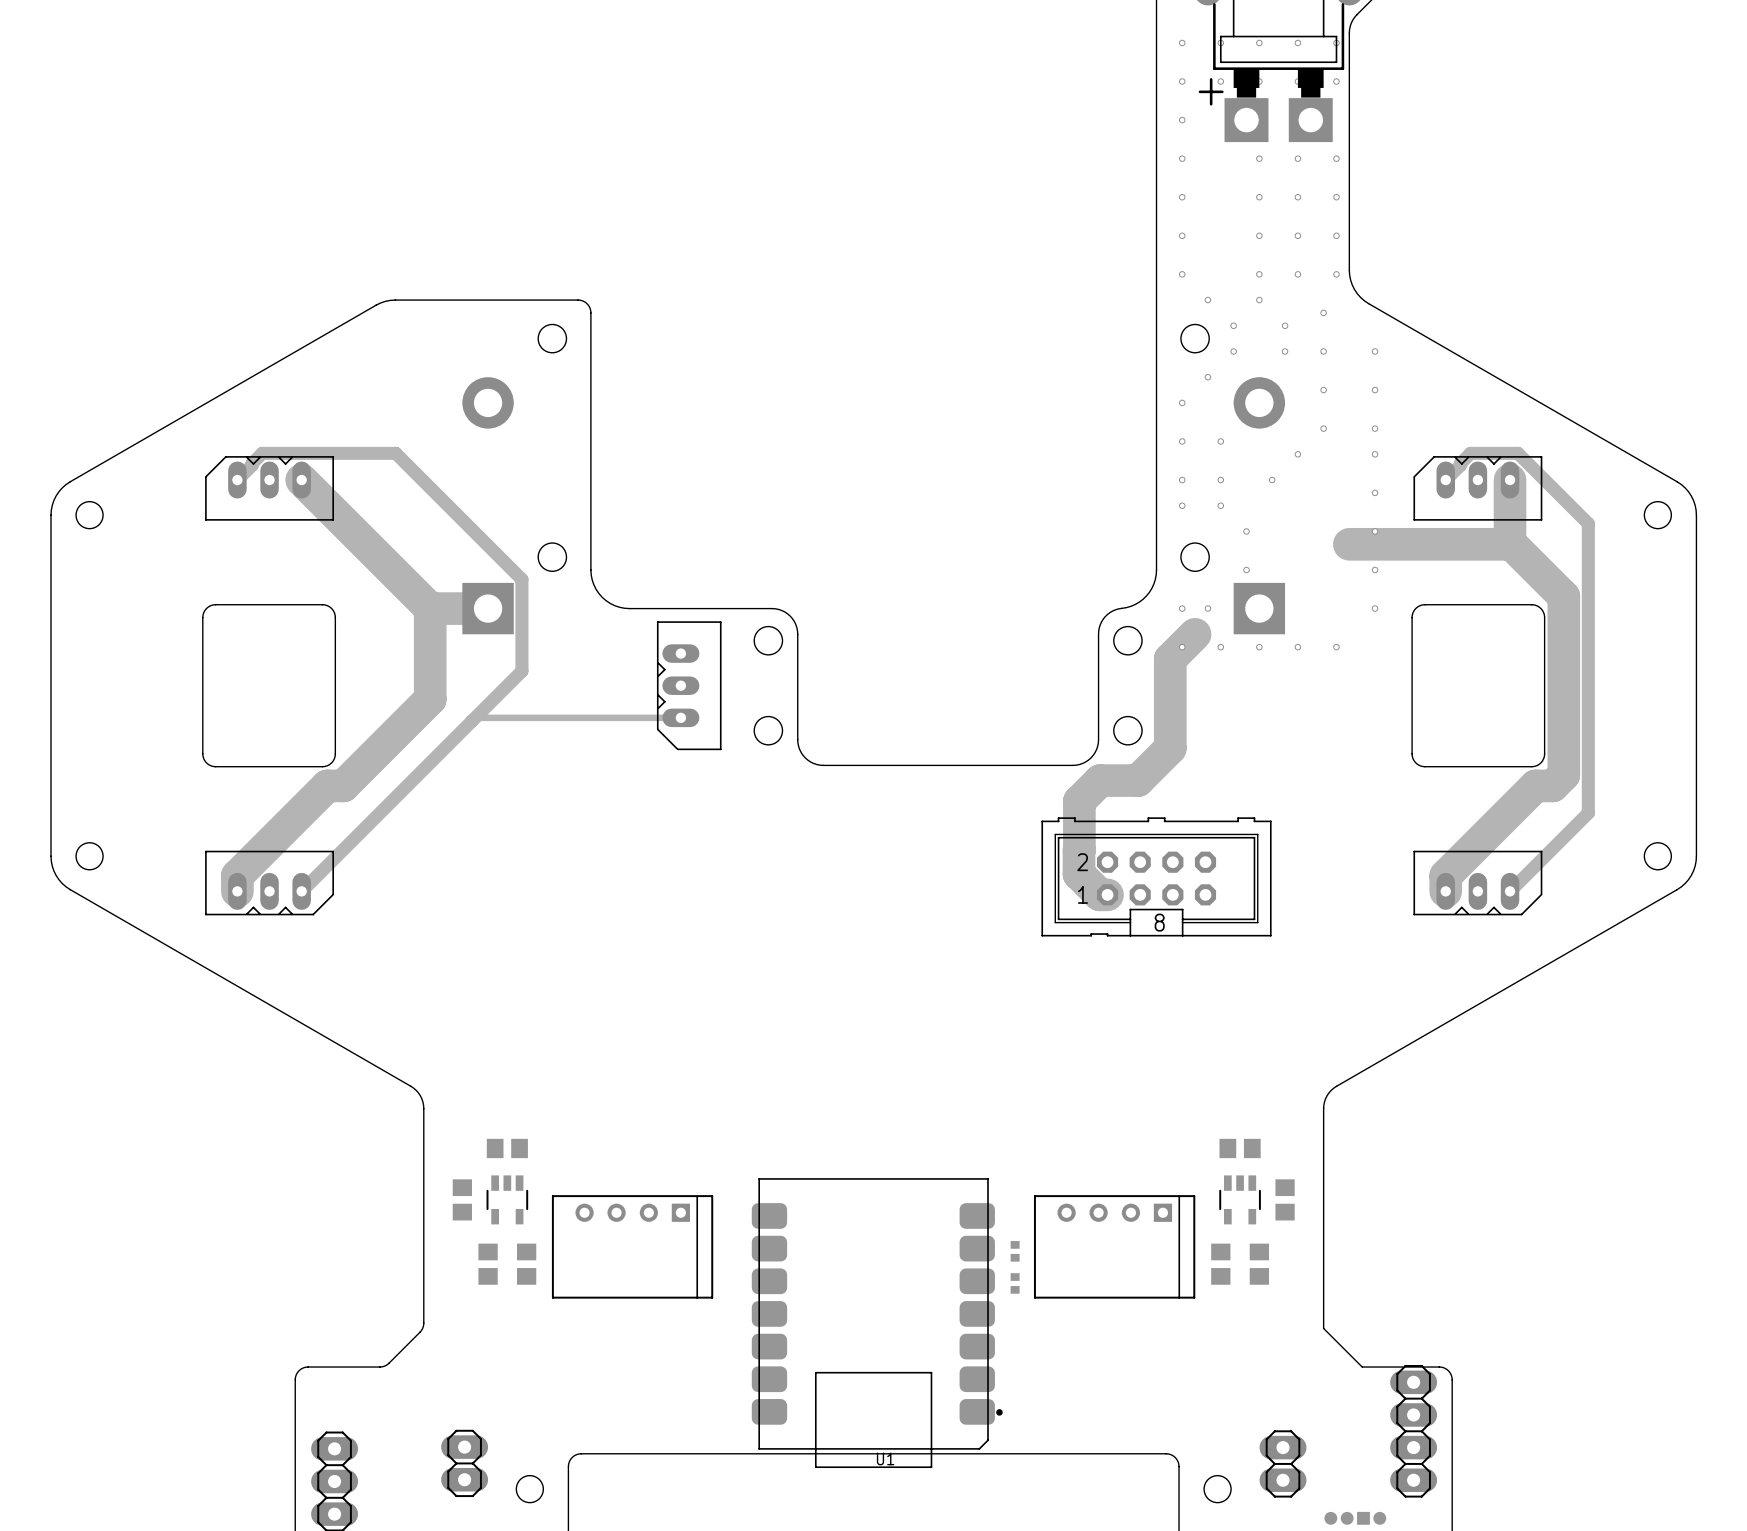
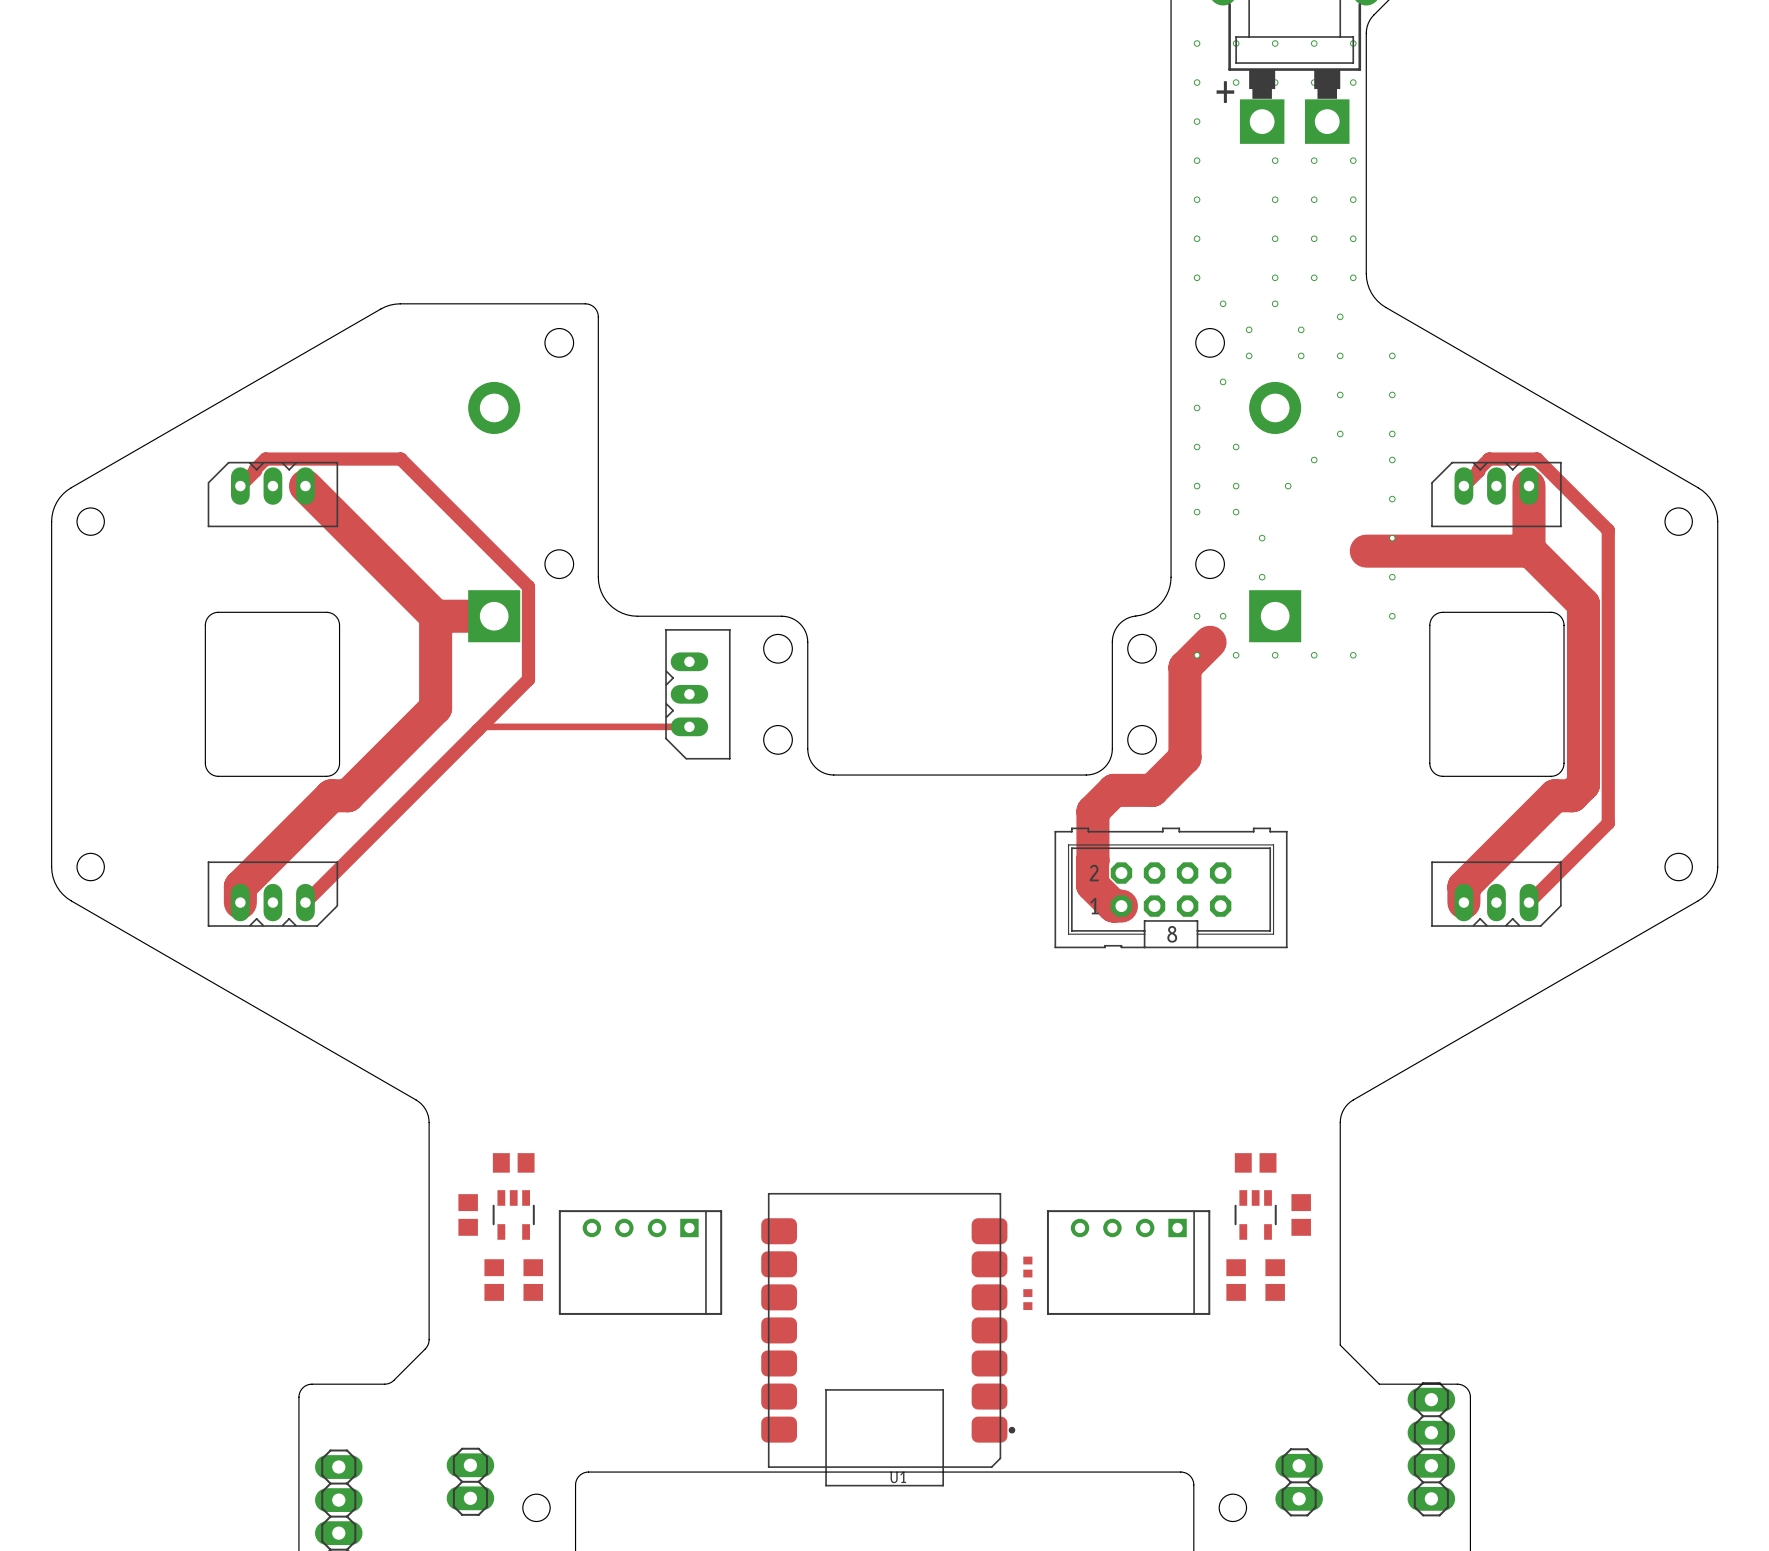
part: (1330, 1518) -> none
part: (1347, 1518) -> none
part: (1363, 1518) -> none
part: (1379, 1518) -> none

